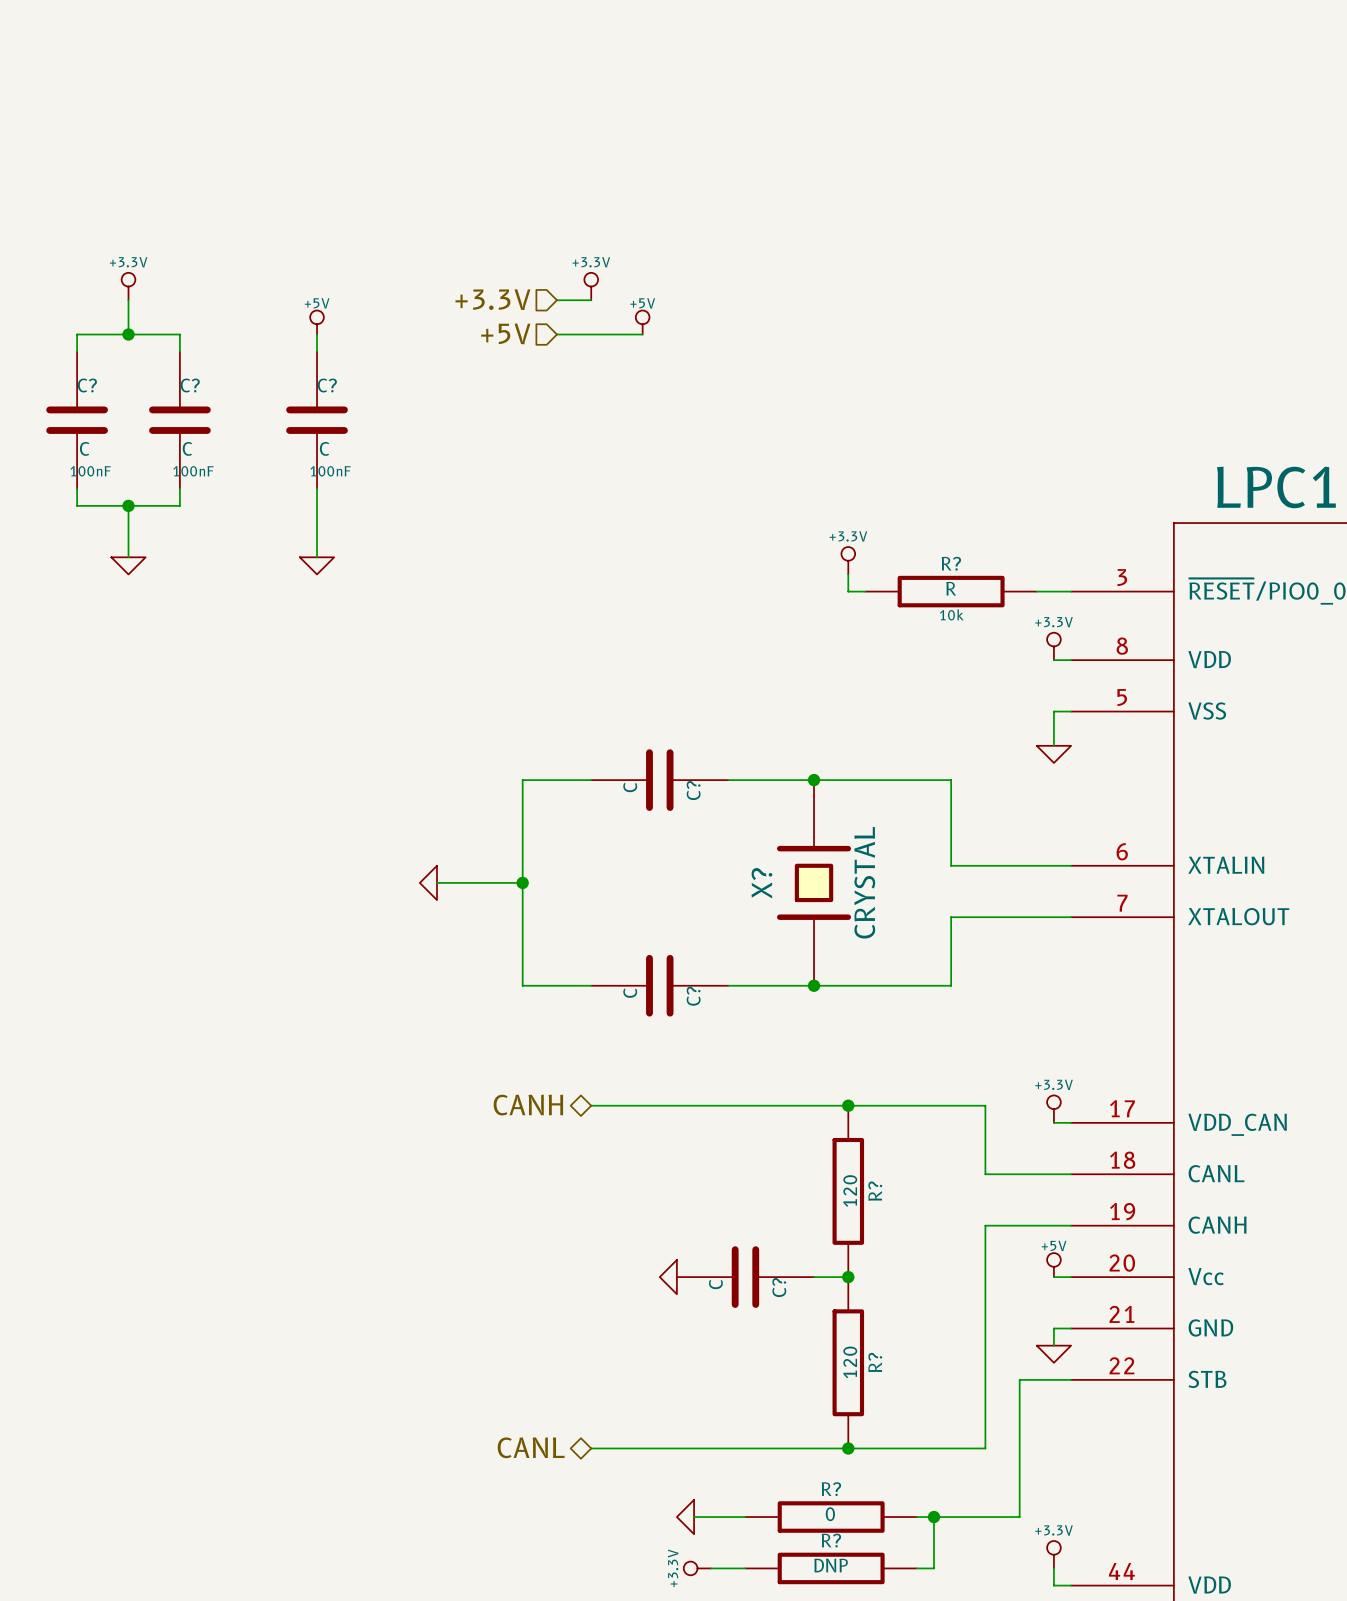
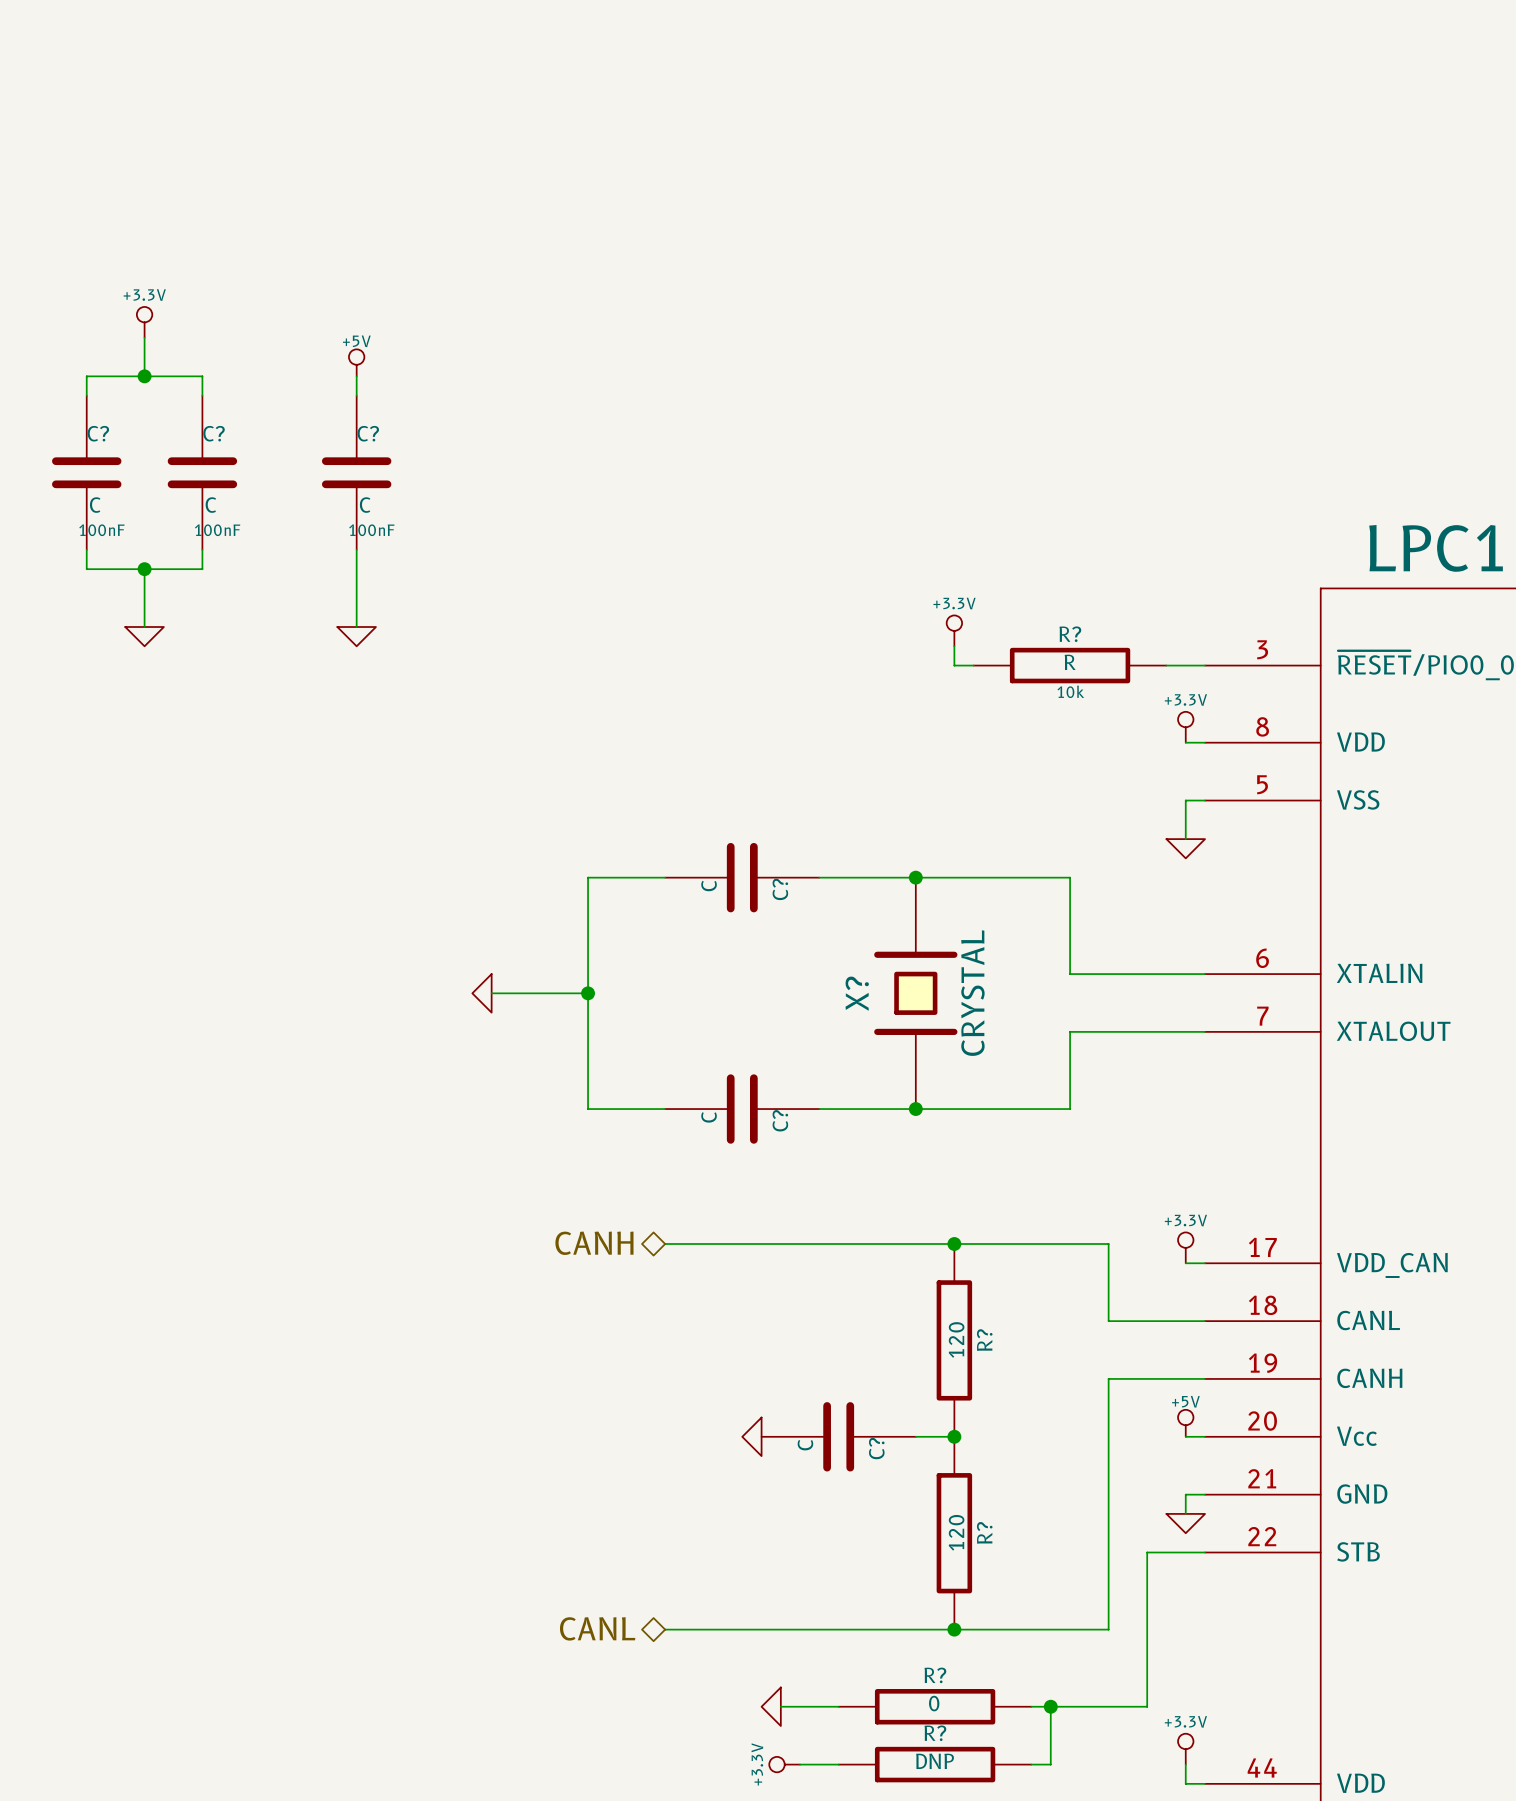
power symbol: +3.3V (591, 286) -> none
hierarchical label: +3.3V (492, 299) -> none
wire: (556, 300) (591, 300) -> none
power symbol: +5V (642, 322) -> none
hierarchical label: +5V (505, 333) -> none
wire: (556, 334) (642, 334) -> none

